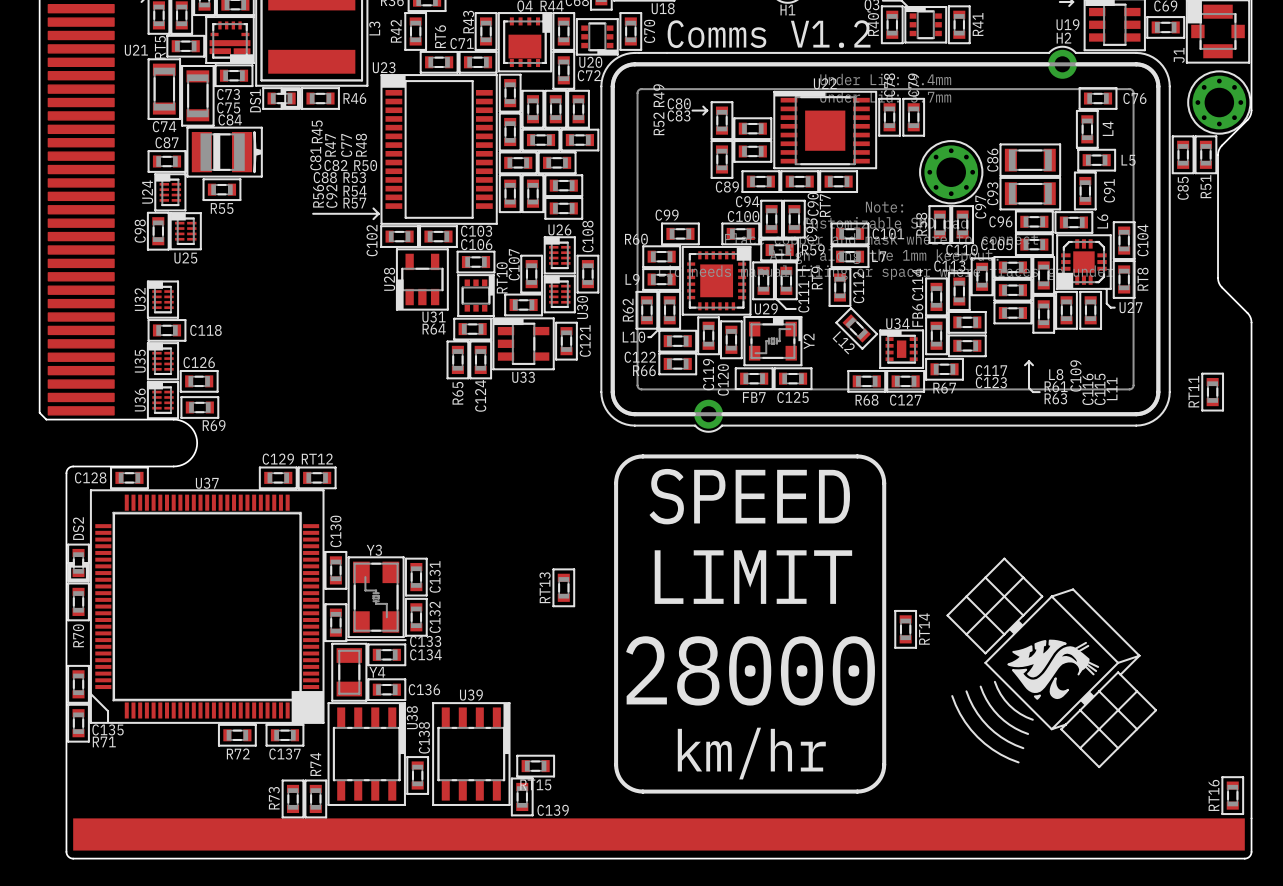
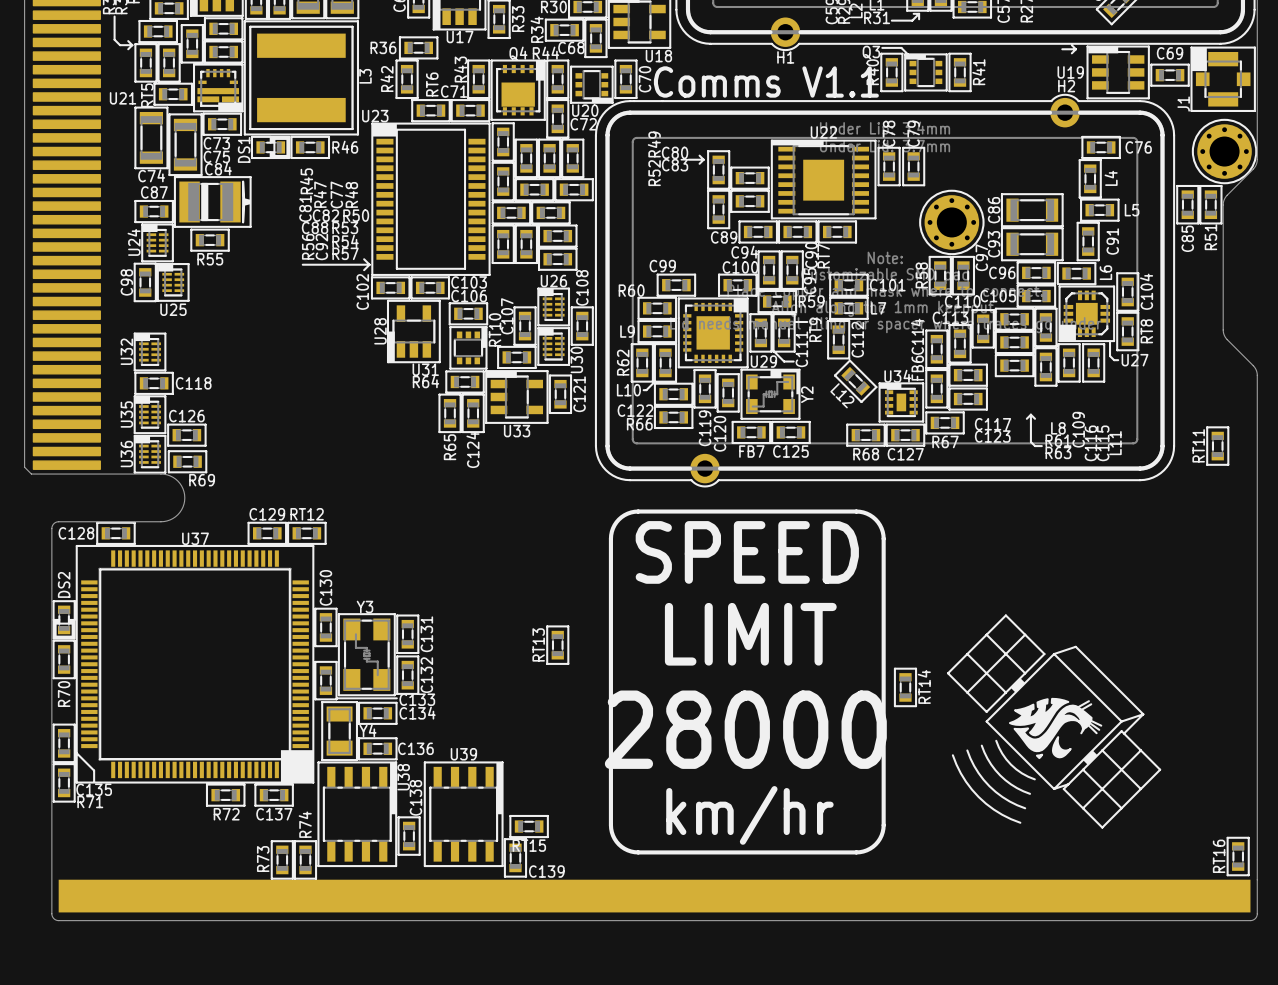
text: Comms V1.2 (769, 34) -> Comms V1.1 (766, 81)

